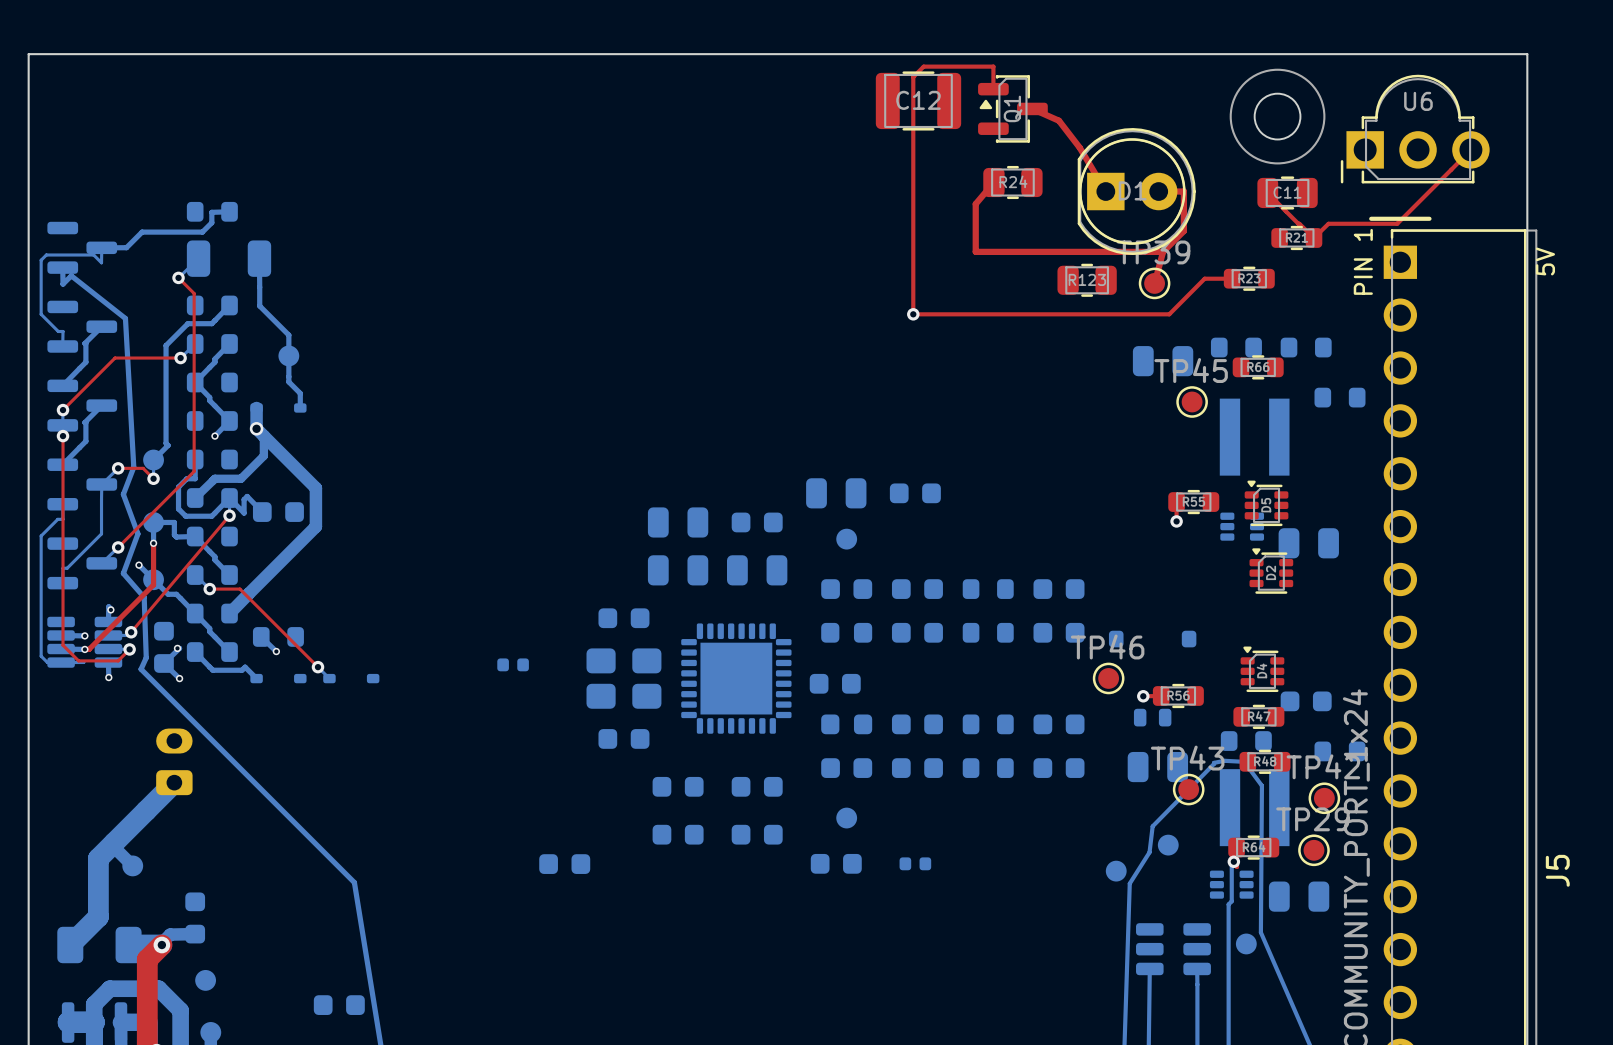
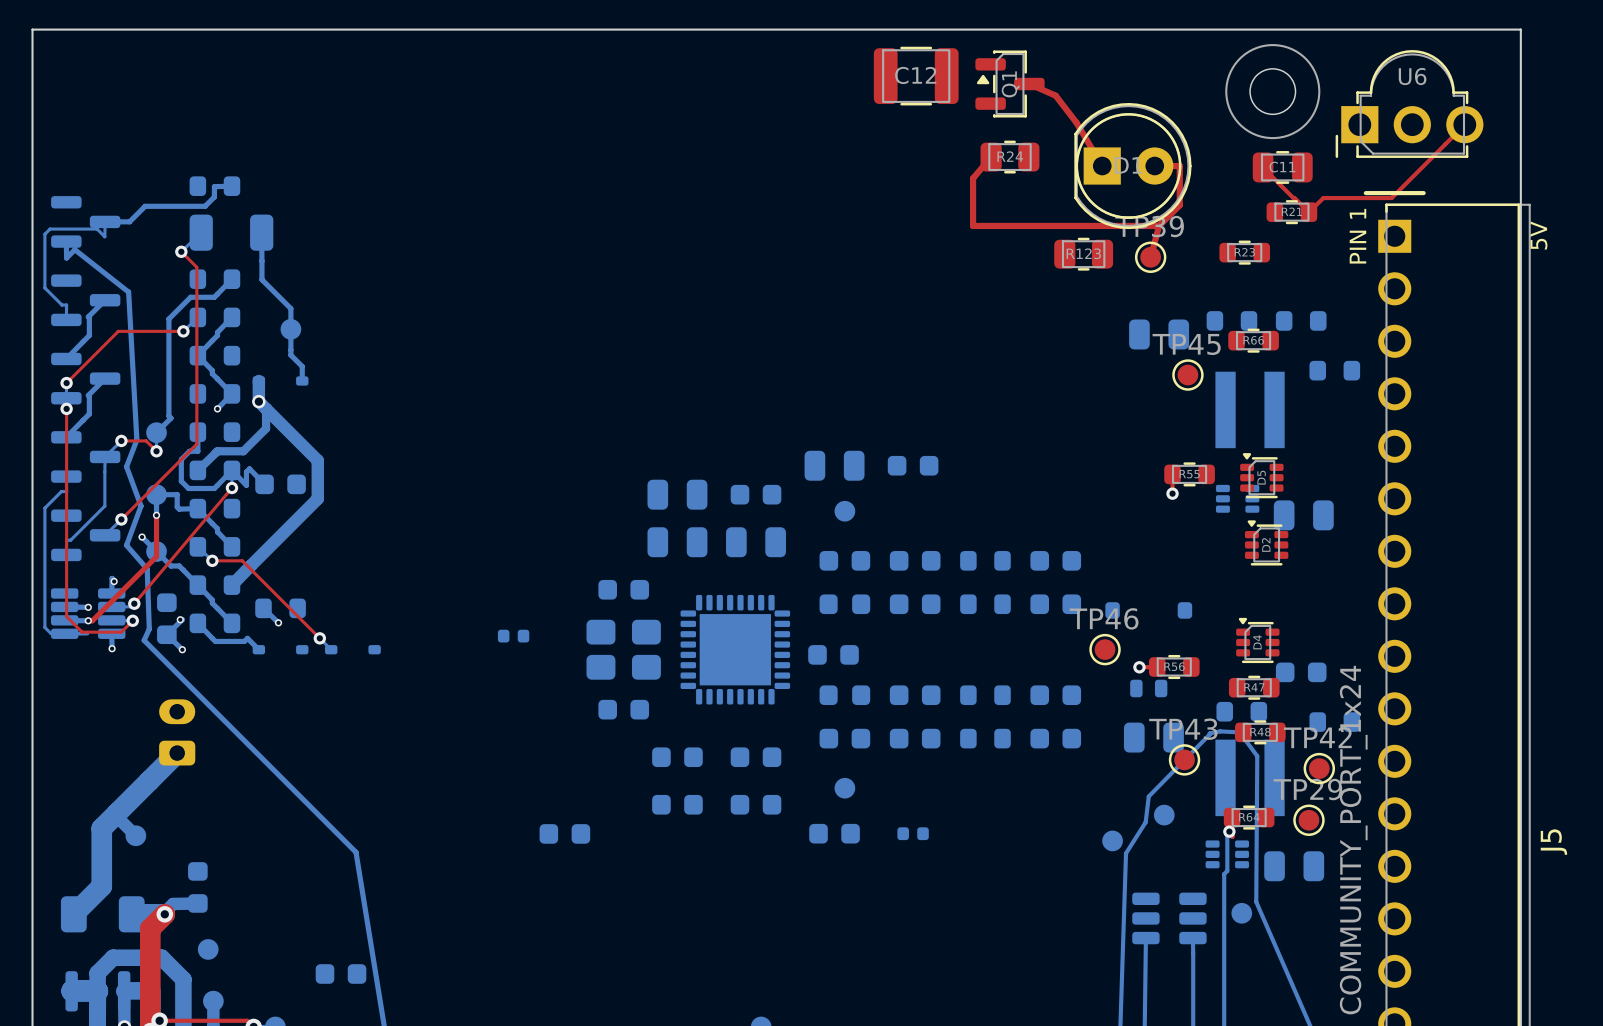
top track: (993, 89) (993, 66) (923, 66) (913, 77) (913, 314) (1169, 314) (1204, 278) (1232, 278) -> none
via: (913, 314) -> none

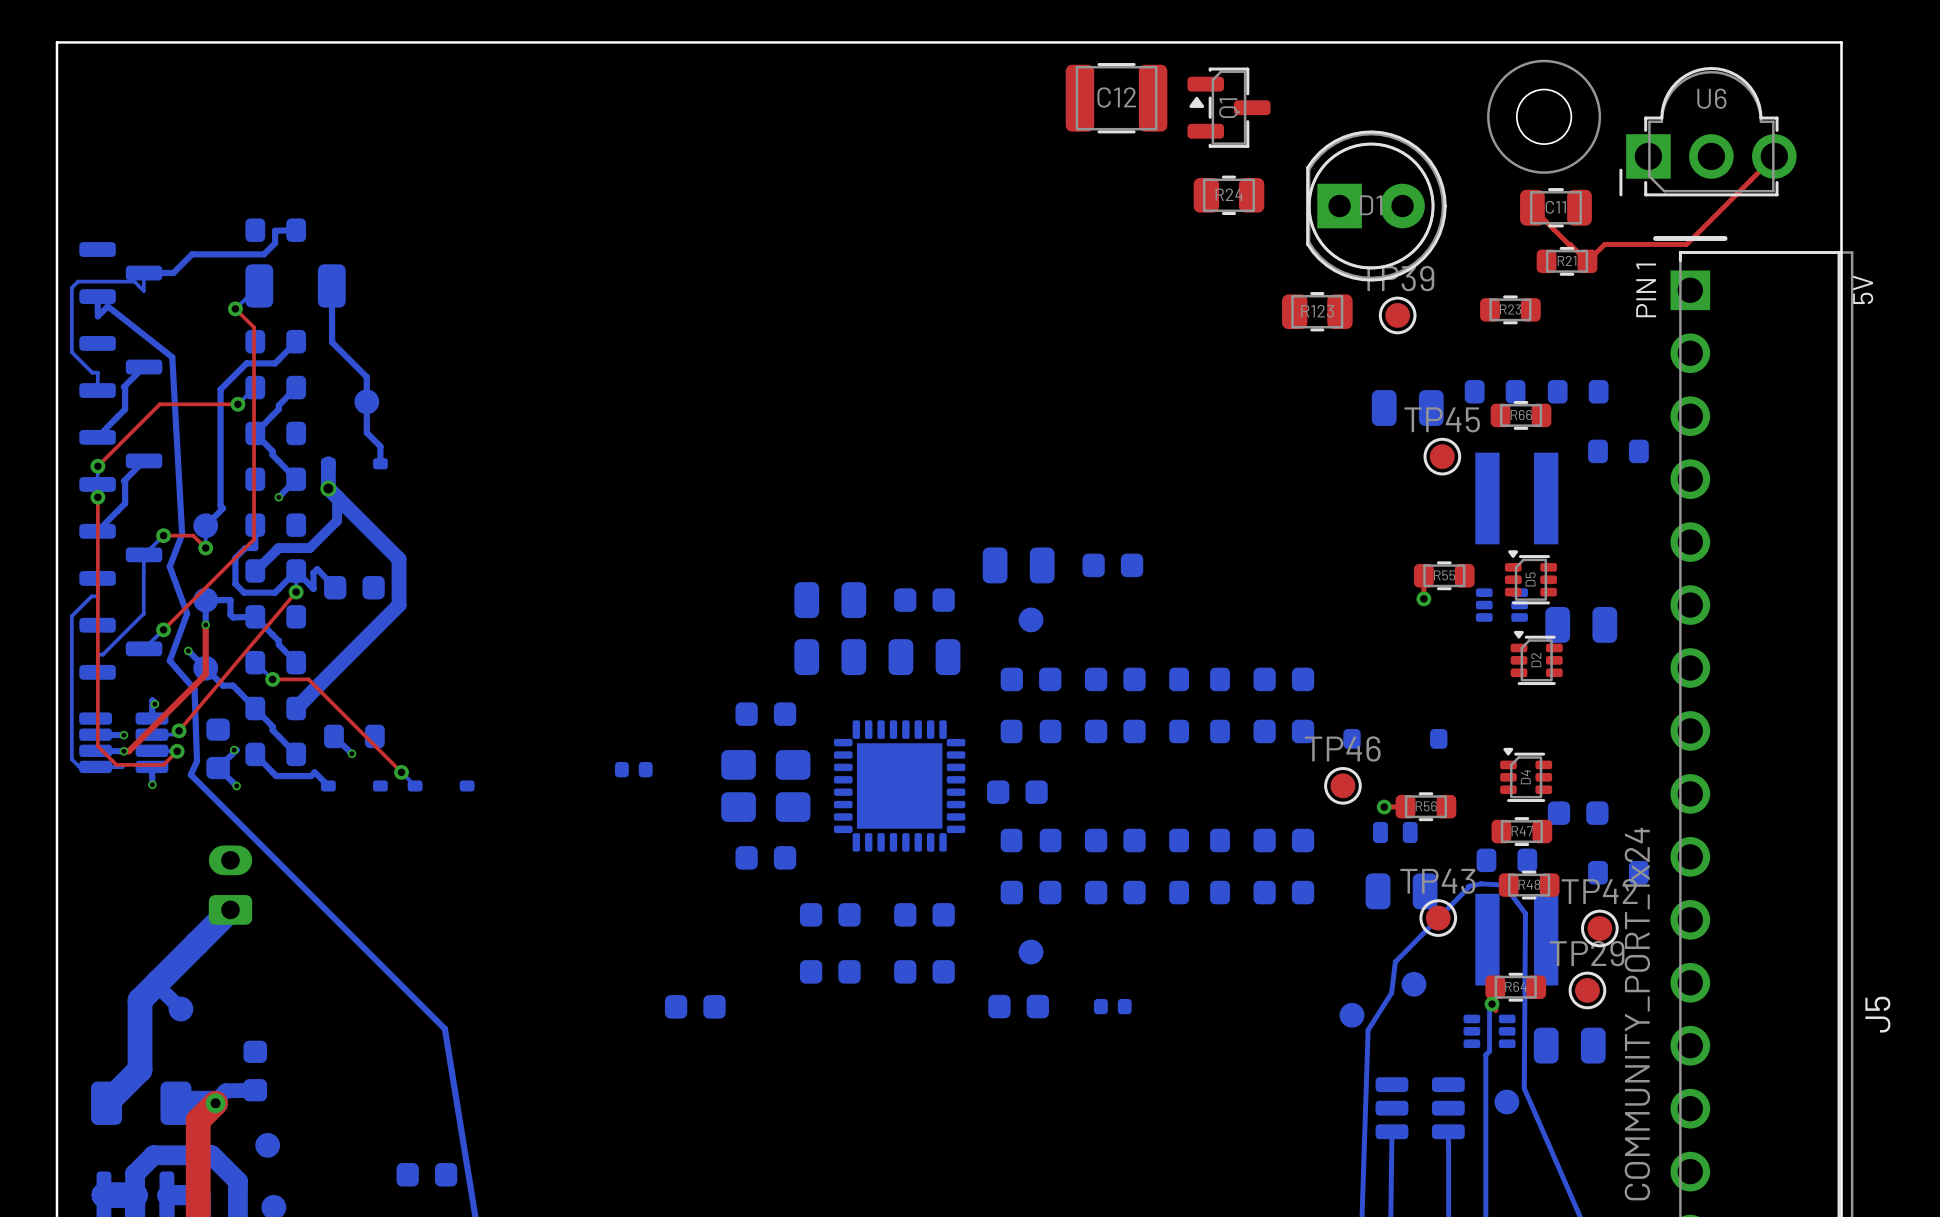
top track: (1029, 84) (1055, 95) (1076, 122) (1102, 166) -> none
top track: (991, 157) (973, 178) (973, 225) (1159, 225) -> none
top track: (1154, 166) (1179, 166) (1179, 205) (1159, 225) -> none
top track: (1159, 225) (1150, 257) -> none

